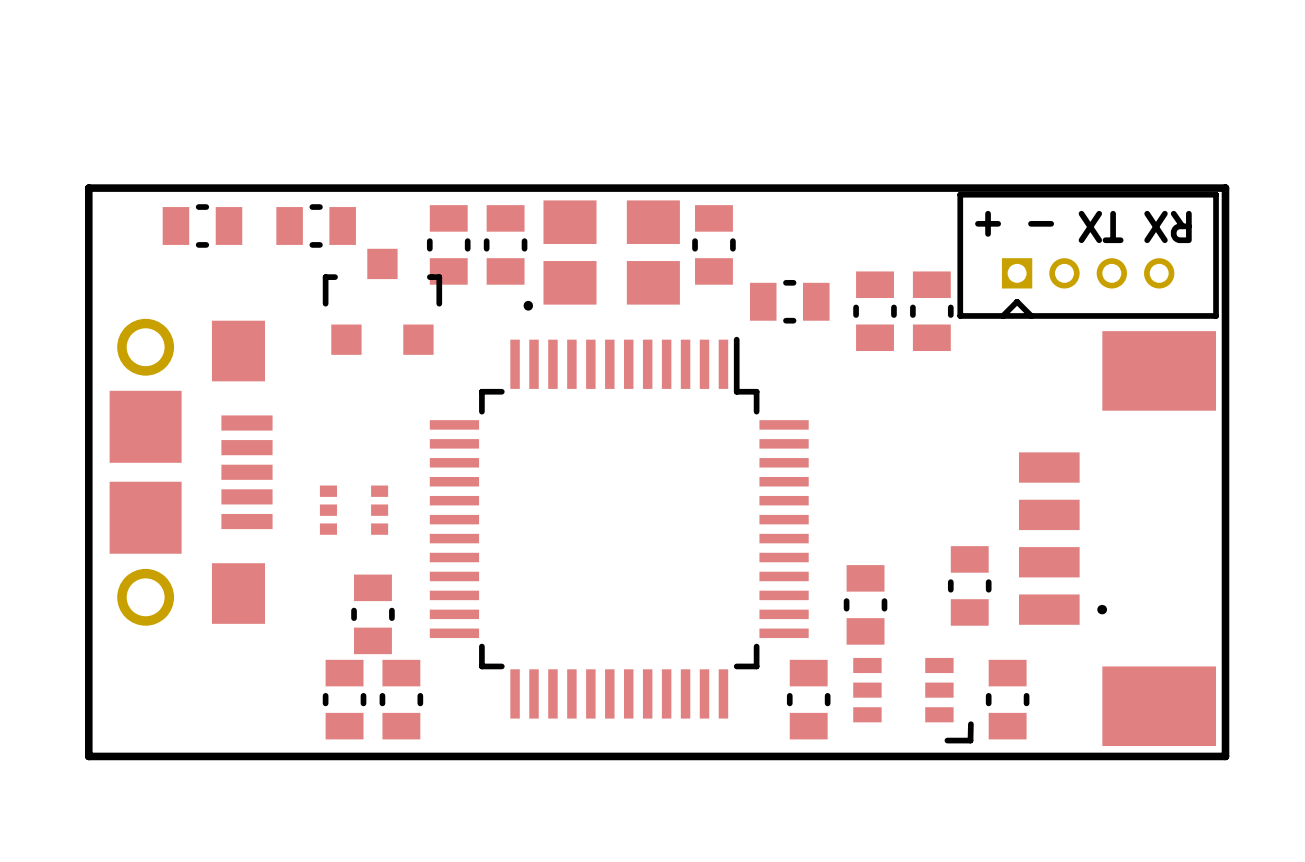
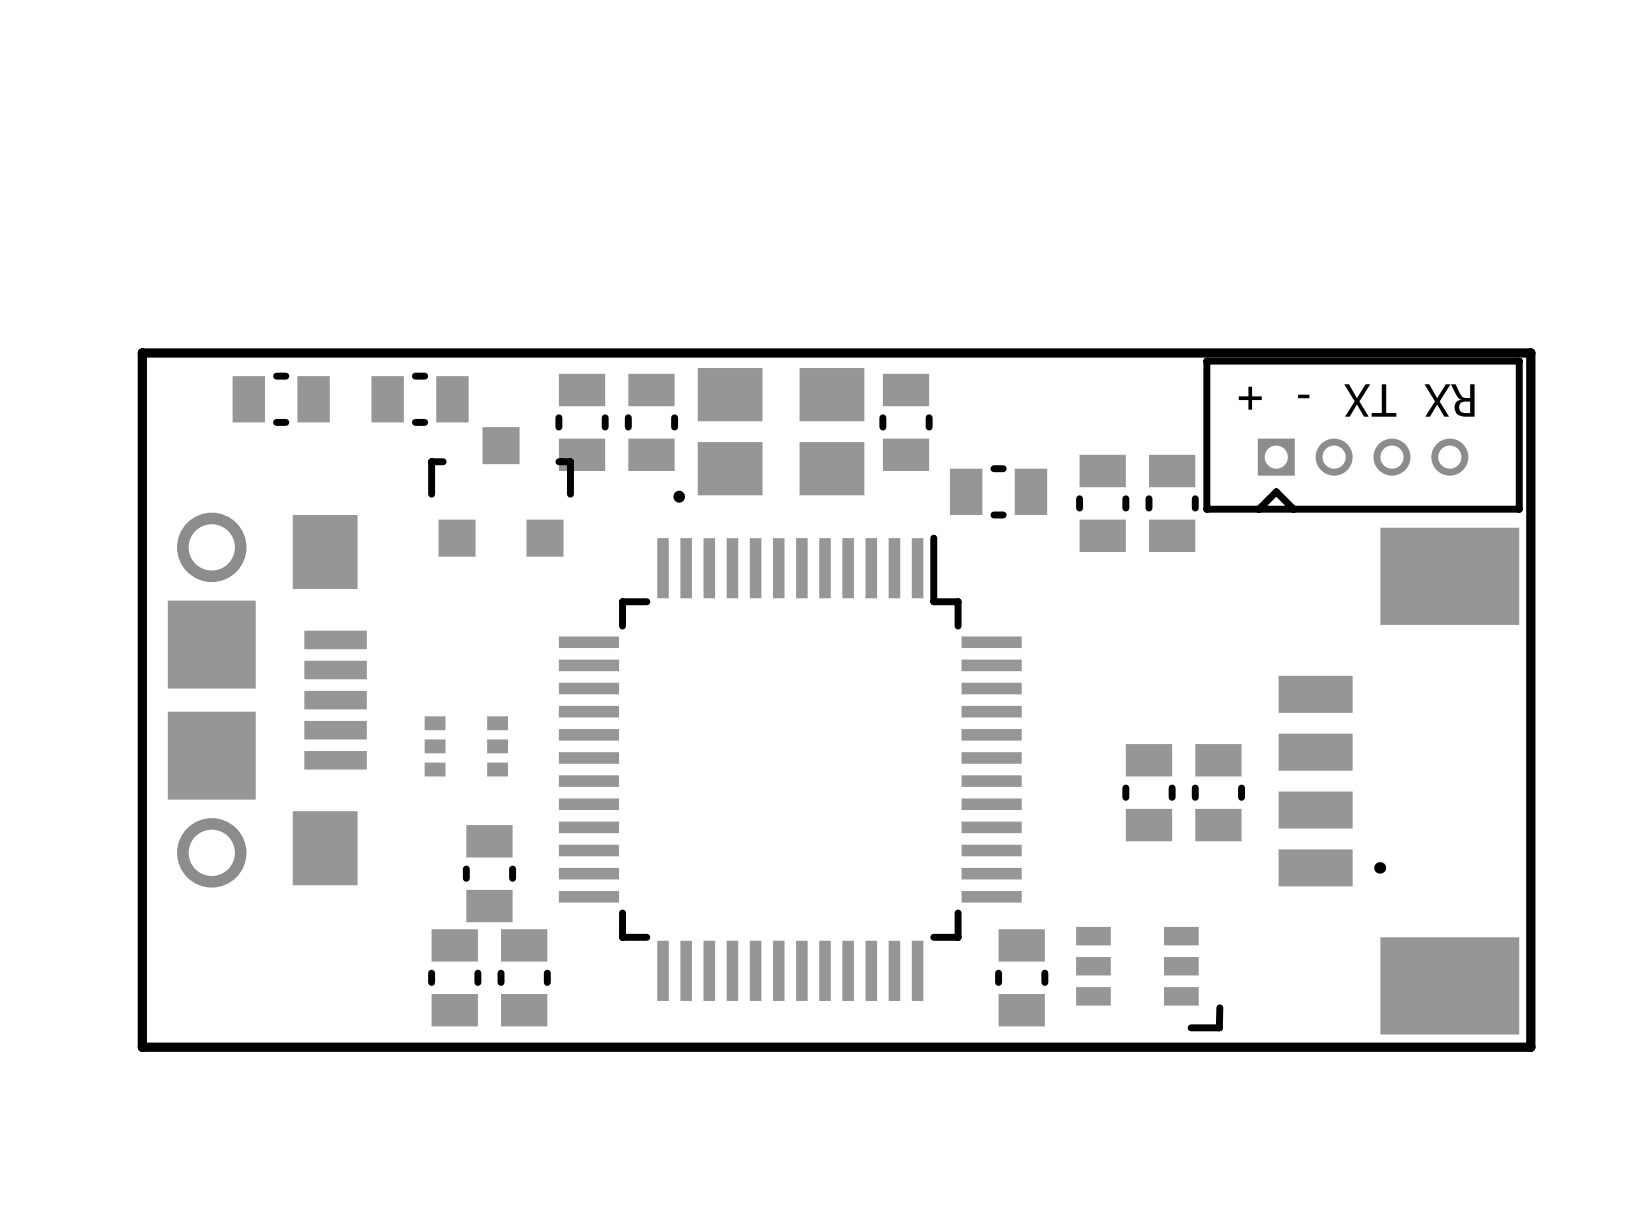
part: none -> (1148, 792)
part: none -> (1218, 792)
part: (969, 585) -> none
part: (865, 604) -> none
part: (1007, 699) -> none

